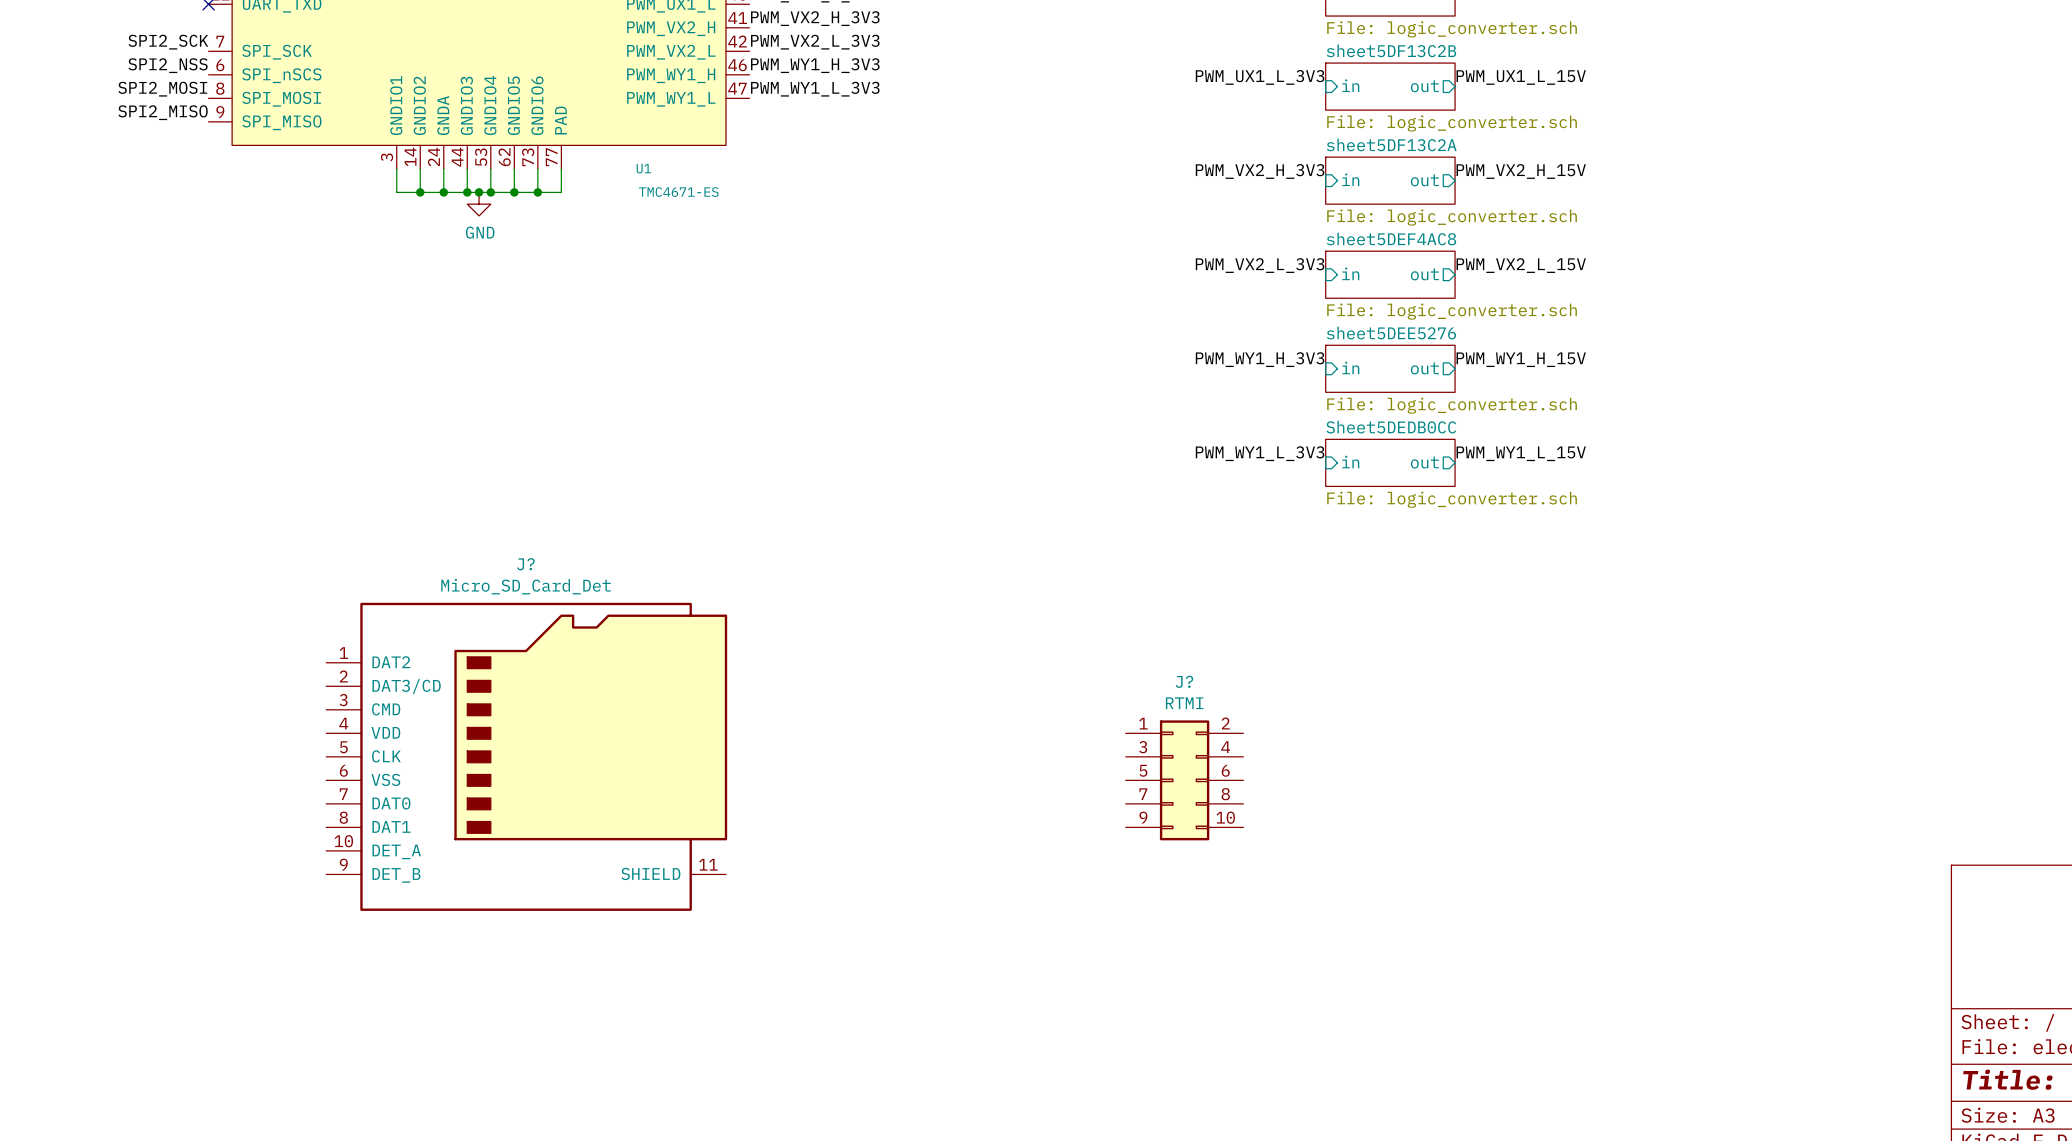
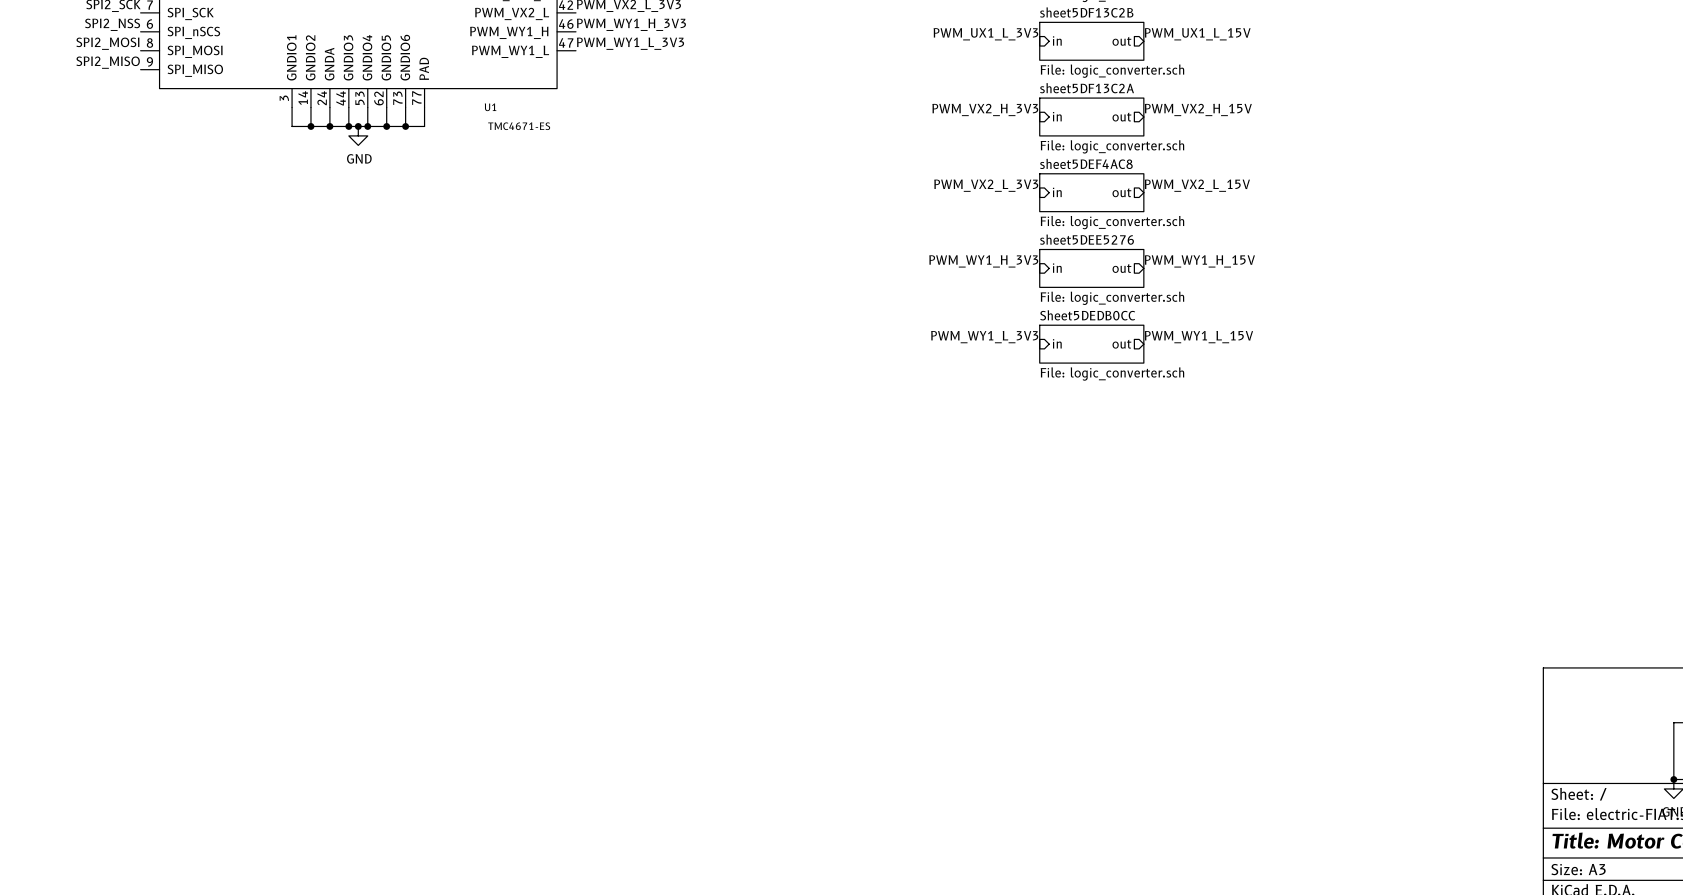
J?: Micro_SD_Card_Det (526, 756) -> none
J?: RTMI (1184, 780) -> none

